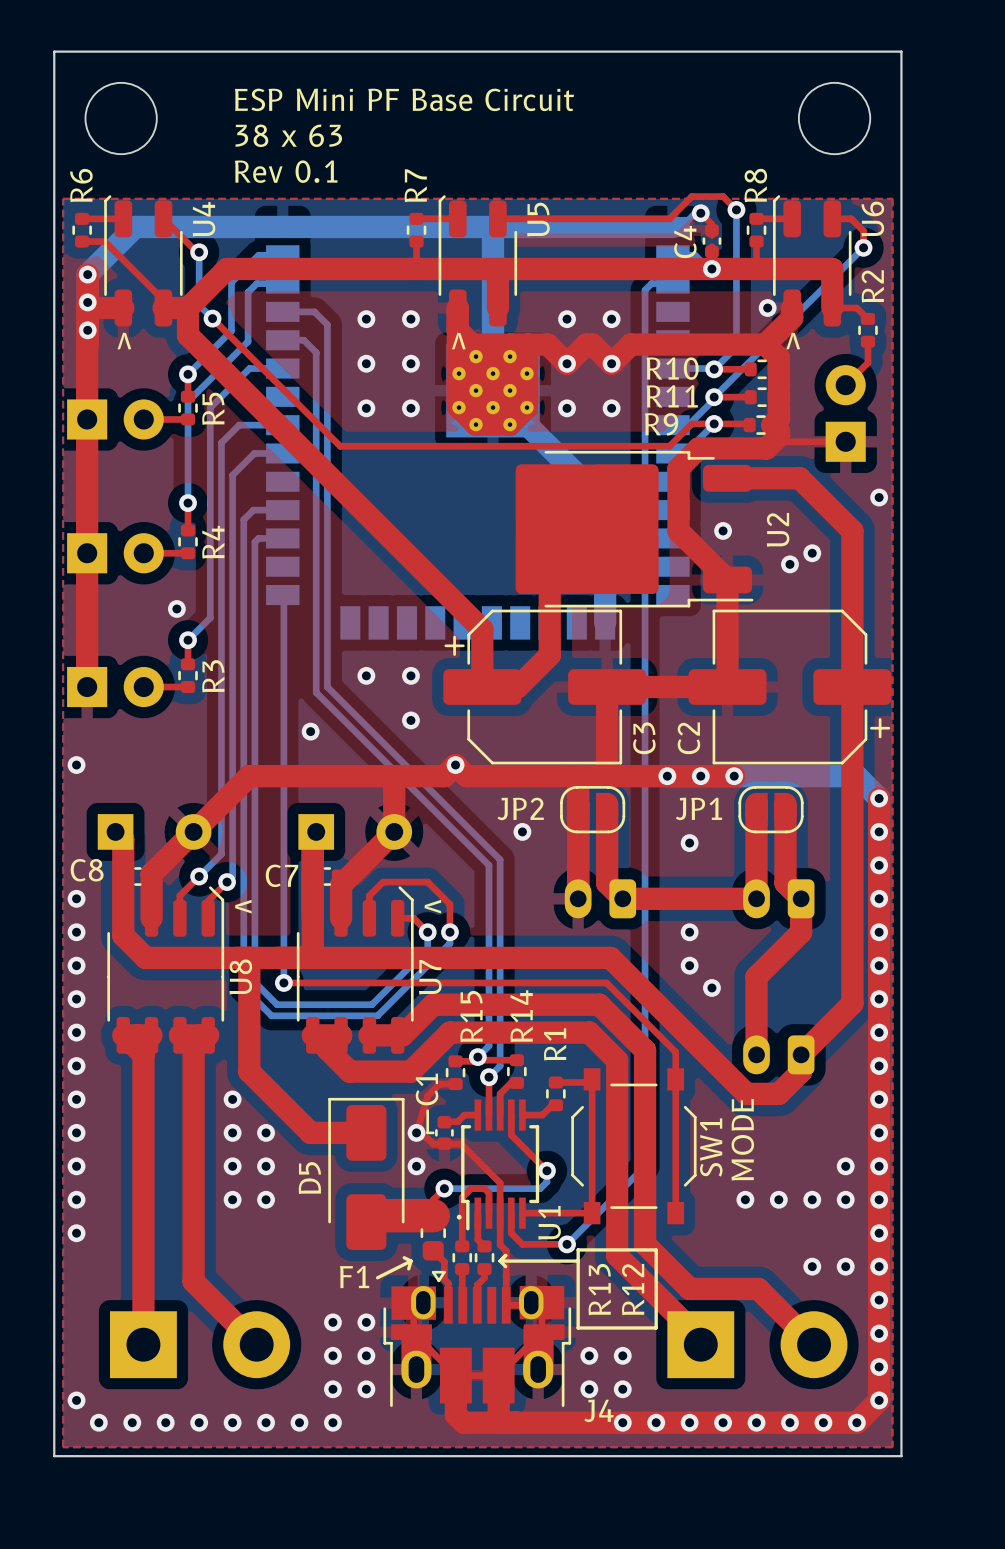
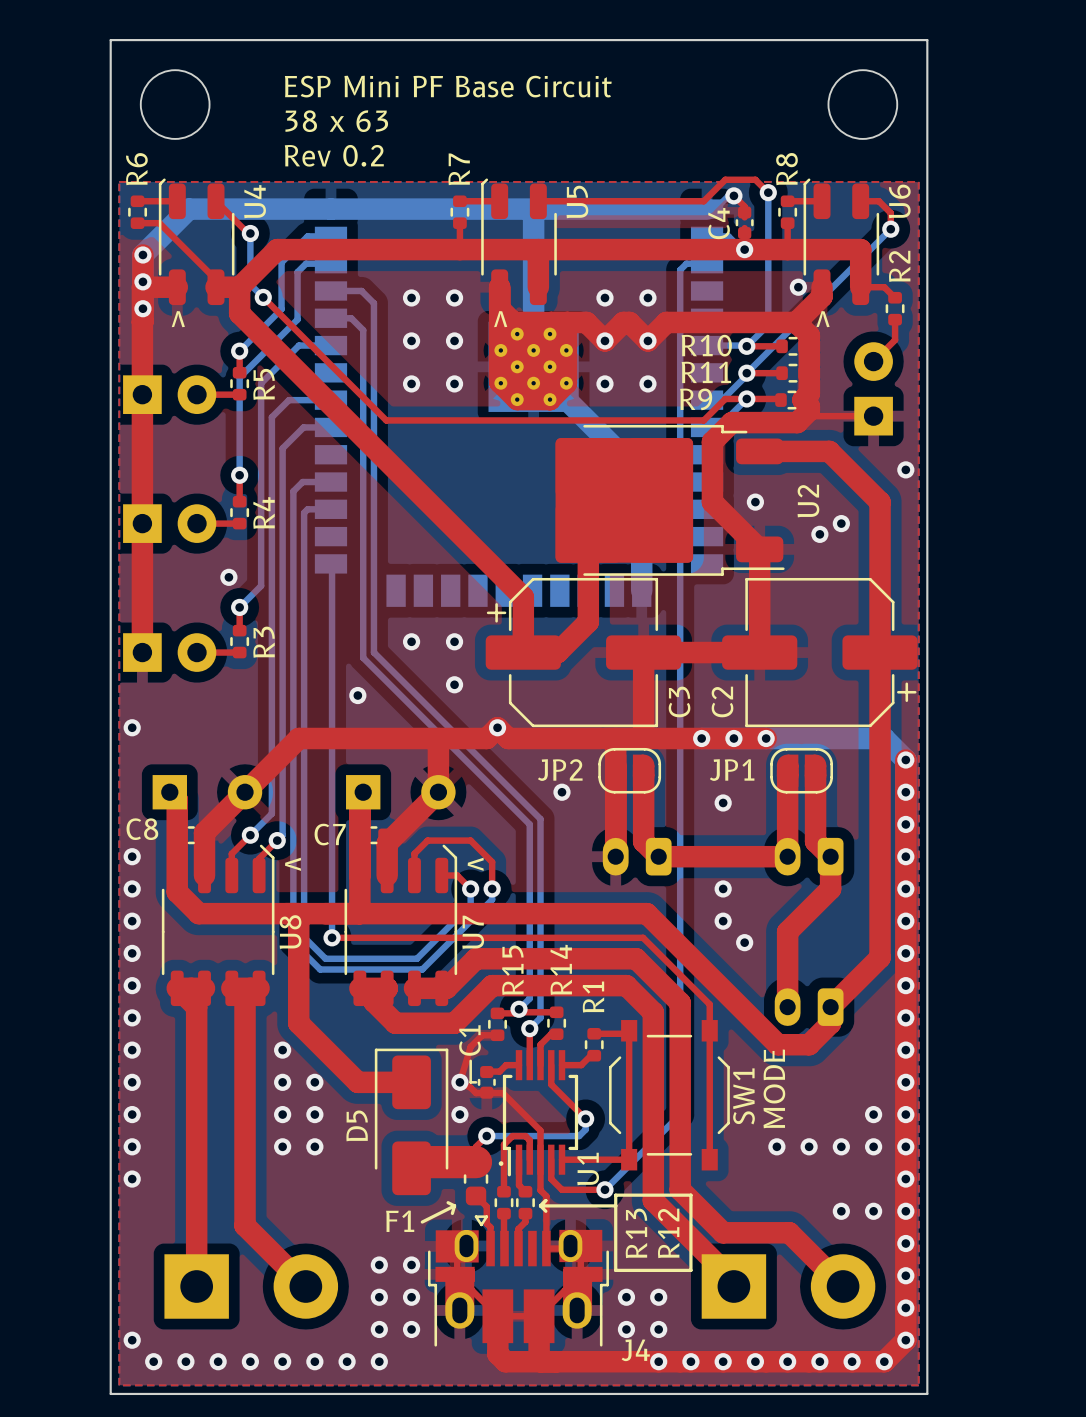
text: Rev 0.1 (286, 171) -> Rev 0.2 (334, 155)

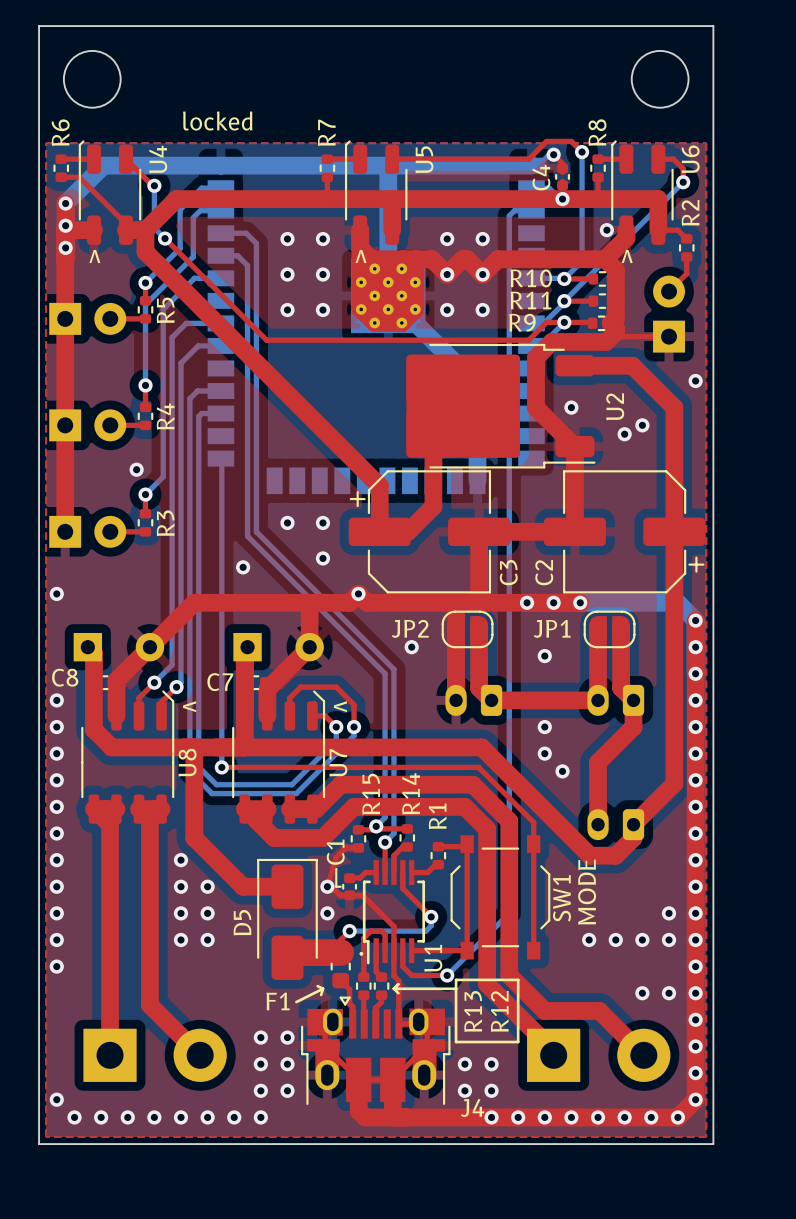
text: ESP Mini PF Base Circuit (448, 86) -> none
text: 38 x 63 (336, 121) -> none
text: Rev 0.2 (334, 155) -> locked (217, 121)

